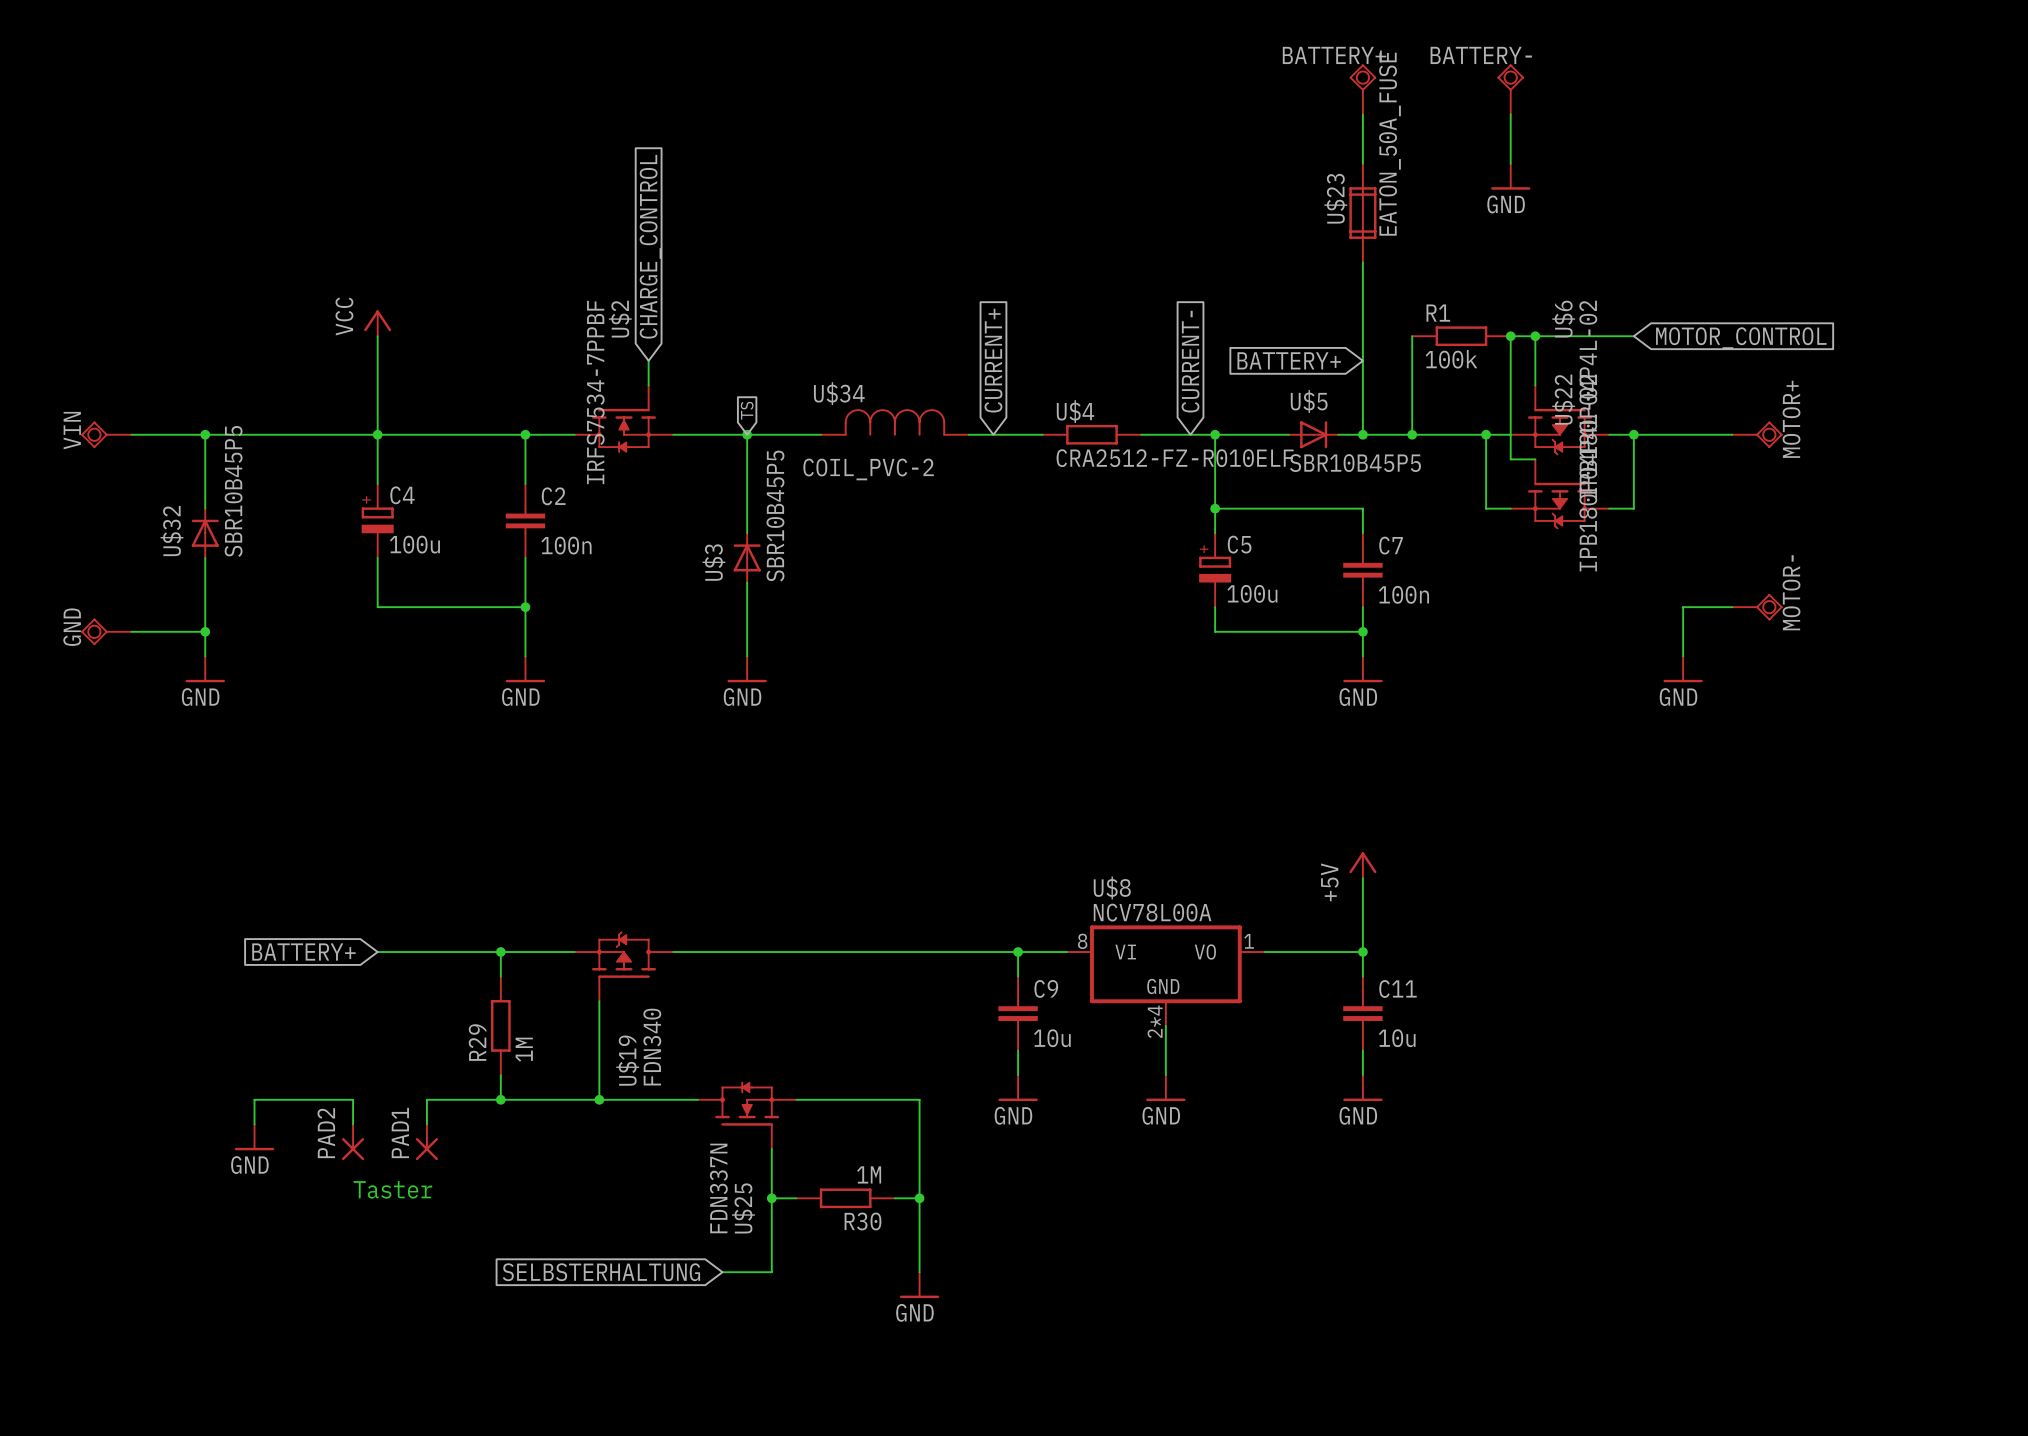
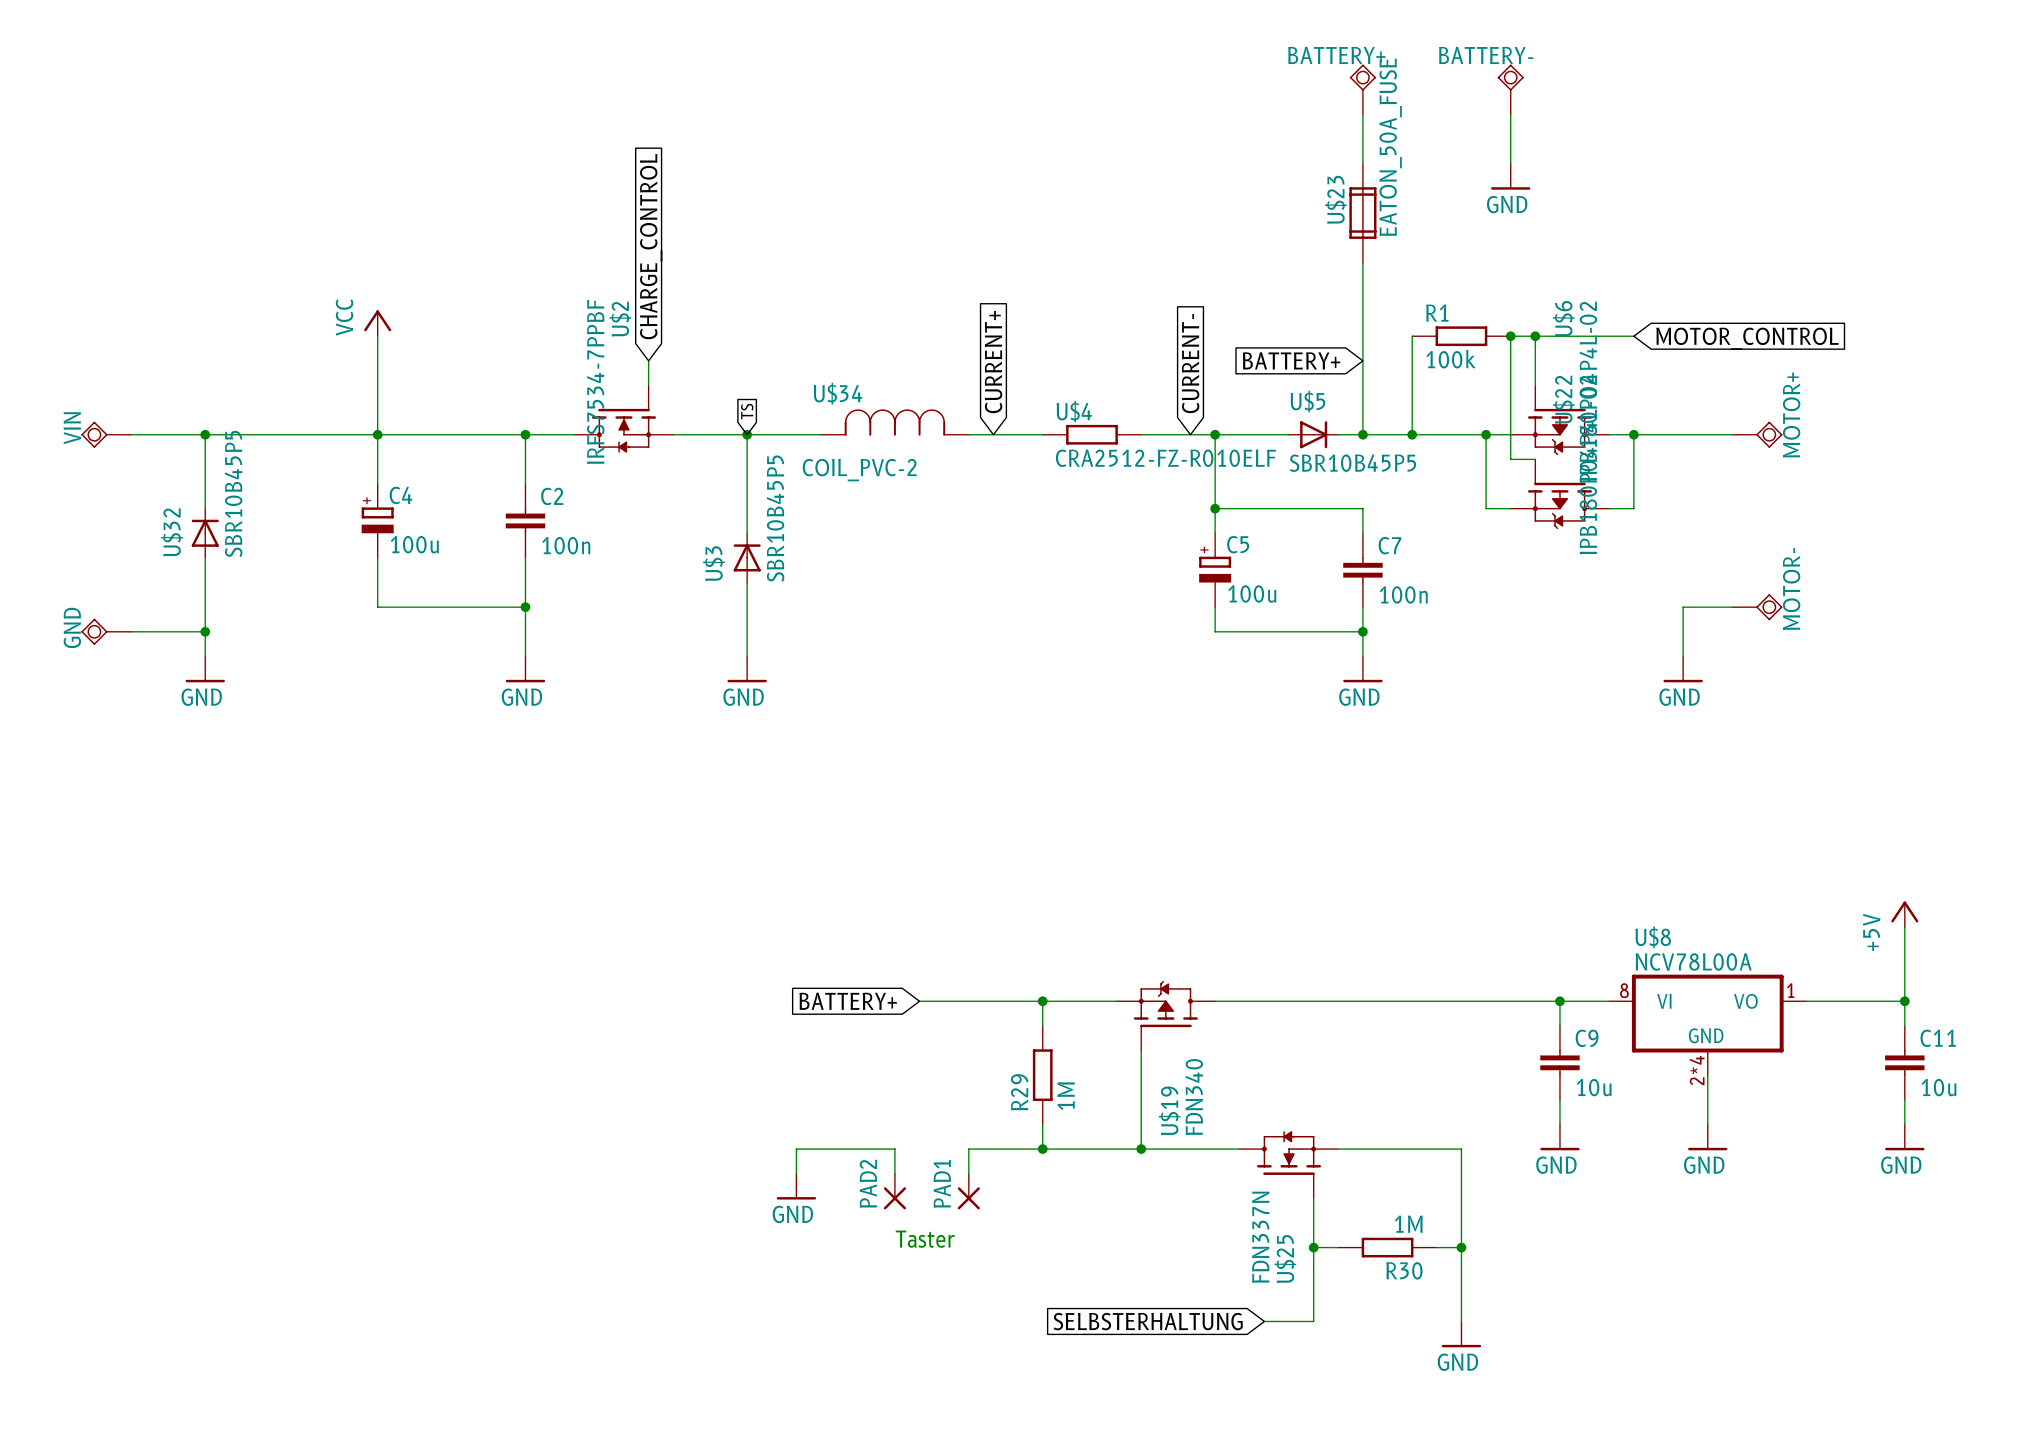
power symbol: +5V (1362, 865) -> none
wire: (1362, 878) (1362, 976) -> none
power symbol: none -> +5V (1904, 914)
wire: none -> (1904, 927) (1904, 1025)
global label: BATTERY+ (303, 952) -> none
wire: (377, 952) (574, 952) -> none
wire: (500, 952) (500, 976) -> none
junction: (500, 952) -> none
wire: (673, 952) (1067, 952) -> none
wire: (1018, 952) (1018, 976) -> (1042, 1001) (1042, 1025)
junction position: (1018, 952) -> (1042, 1001)
wire: (1264, 952) (1362, 952) -> none
junction: (1362, 952) -> none
U$19 position: (623, 966) -> (1165, 1015)
U$8 position: (1165, 975) -> (1707, 1024)
wire: (599, 1001) (599, 1099) -> none
global label: none -> BATTERY+ (848, 1001)
wire: none -> (919, 1001) (1116, 1001)
wire: none -> (1215, 1001) (1609, 1001)
junction: none -> (1559, 1001)
wire: none -> (1806, 1001) (1904, 1001)
junction: none -> (1904, 1001)
C9 position: (1018, 1013) -> (1559, 1062)
C11 position: (1362, 1013) -> (1904, 1062)
R29 position: (500, 1025) -> (1042, 1075)
wire: (1165, 1025) (1165, 1075) -> none
wire: (1018, 1050) (1018, 1075) -> (1042, 1124) (1042, 1149)
wire: none -> (1141, 1050) (1141, 1149)
wire: (1362, 1050) (1362, 1075) -> (1559, 1001) (1559, 1025)
wire: (500, 1075) (500, 1099) -> none
wire: none -> (1707, 1075) (1707, 1124)
power symbol: GND (1018, 1088) -> none
power symbol: GND (1165, 1088) -> none
power symbol: GND (1362, 1088) -> none
junction: (500, 1099) -> none
junction: (599, 1099) -> none
wire: (697, 1099) (426, 1099) (426, 1124) -> none
wire: (796, 1099) (919, 1099) (919, 1272) -> none
wire: none -> (1559, 1099) (1559, 1124)
wire: none -> (1904, 1099) (1904, 1124)
U$25 position: (747, 1115) -> (1289, 1164)
wire: (254, 1124) (254, 1099) (353, 1099) (353, 1124) -> none
power symbol: GND (254, 1137) -> none
power symbol: none -> GND (1559, 1137)
power symbol: none -> GND (1707, 1137)
power symbol: none -> GND (1904, 1137)
PAD2 position: (353, 1142) -> (894, 1191)
PAD1 position: (426, 1142) -> (968, 1191)
wire: (771, 1149) (771, 1272) (722, 1272) -> none
junction: none -> (1042, 1149)
junction: none -> (1141, 1149)
wire: none -> (1239, 1149) (968, 1149) (968, 1173)
wire: none -> (1338, 1149) (1461, 1149) (1461, 1321)
wire: none -> (796, 1173) (796, 1149) (894, 1149) (894, 1173)
power symbol: none -> GND (796, 1186)
text: Taster (392, 1189) -> none
junction: (771, 1198) -> none
R30 position: (845, 1198) -> (1387, 1247)
wire: (894, 1198) (919, 1198) -> none
junction: (919, 1198) -> none
wire: none -> (1313, 1198) (1313, 1321) (1264, 1321)
text: none -> Taster (925, 1239)
wire: none -> (1313, 1247) (1338, 1247)
junction: none -> (1313, 1247)
wire: none -> (1436, 1247) (1461, 1247)
junction: none -> (1461, 1247)
global label: SELBSTERHALTUNG (601, 1272) -> none
power symbol: GND (919, 1285) -> none
global label: none -> SELBSTERHALTUNG (1148, 1321)
power symbol: none -> GND (1461, 1334)

